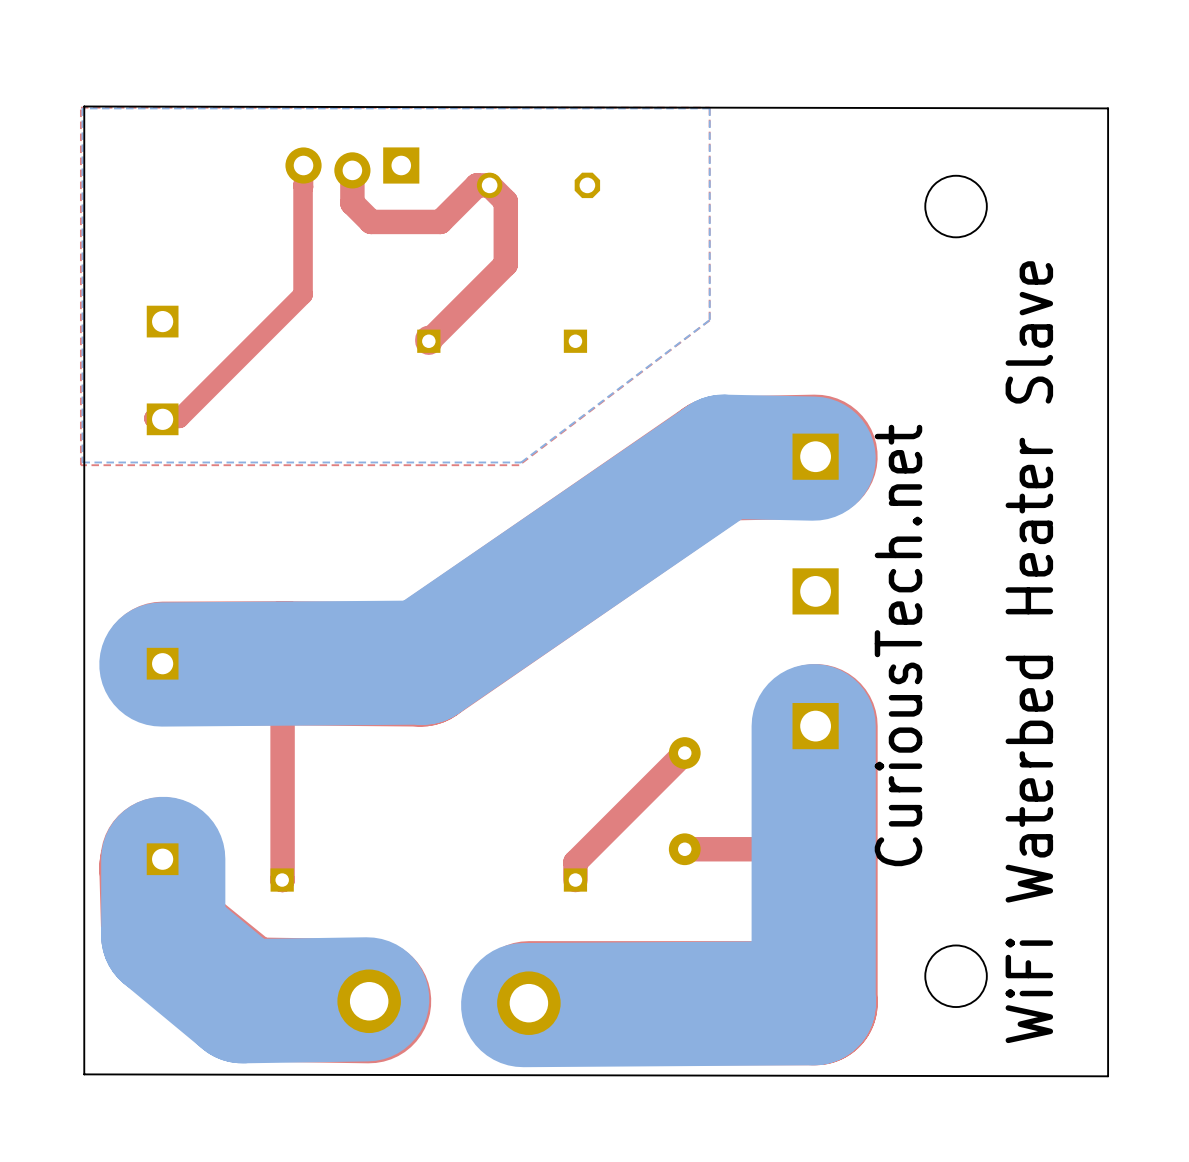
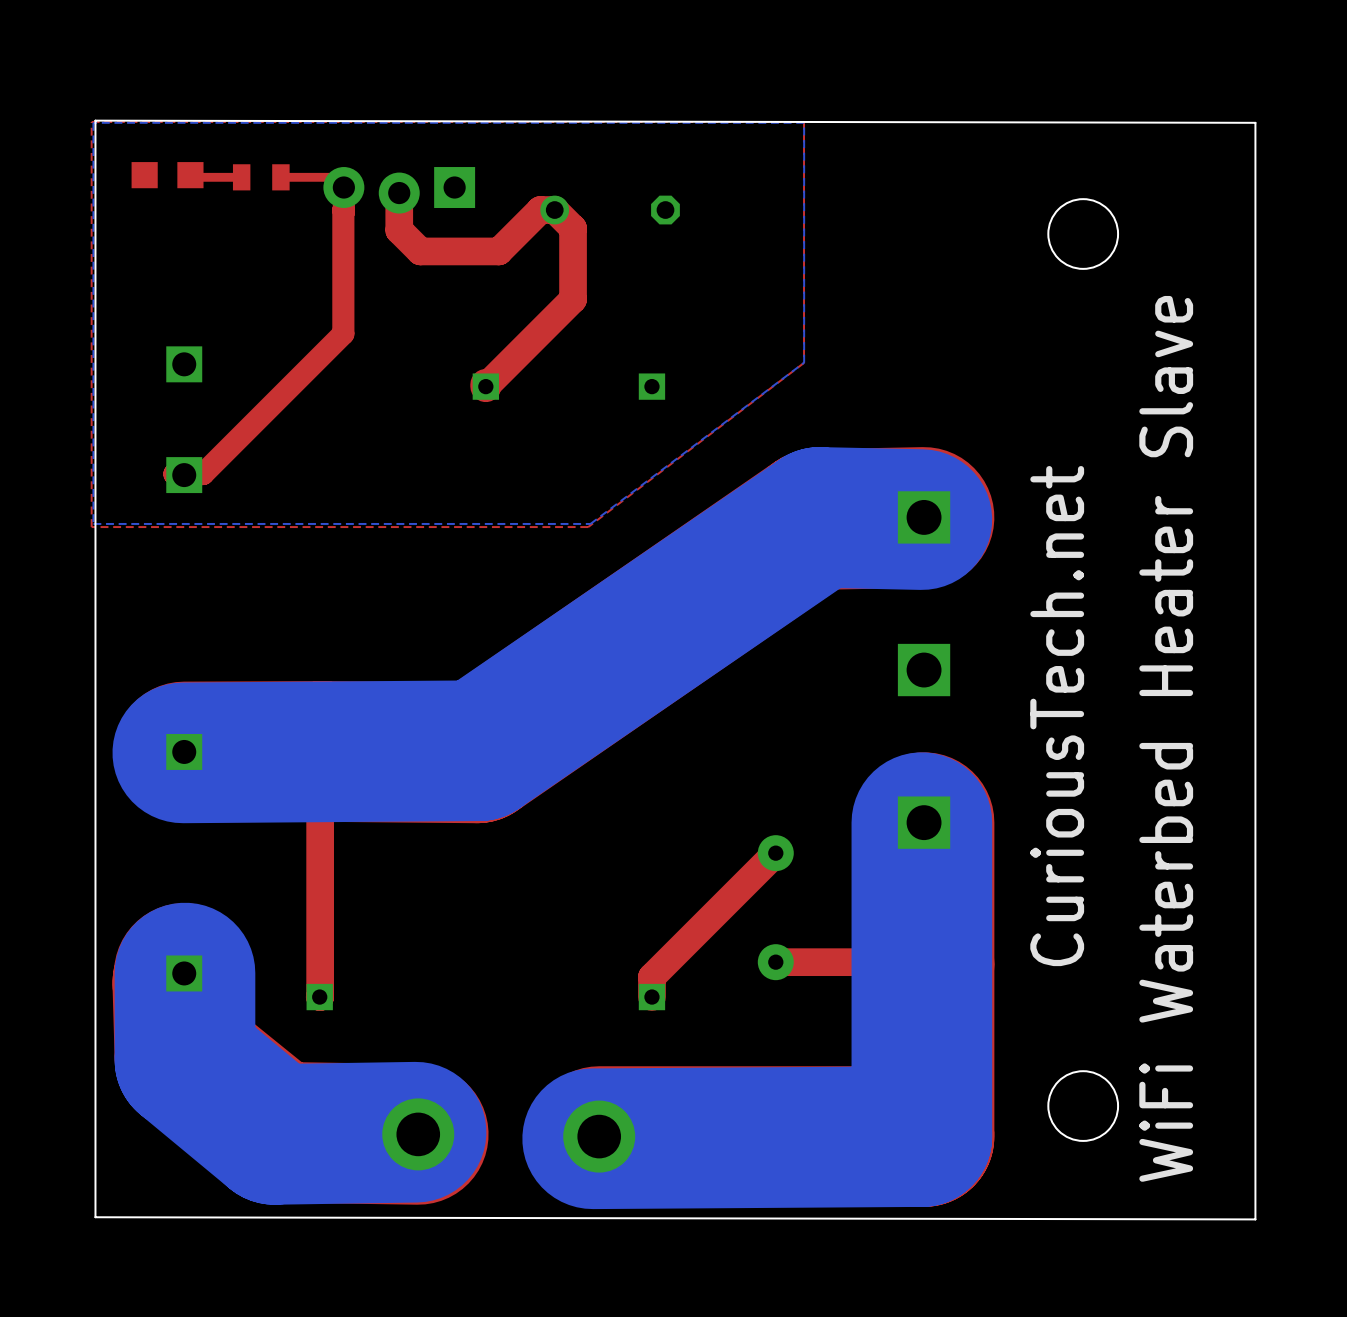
part: none -> (167, 175)
top track: none -> (190, 175) (190, 177) (241, 177)
part: none -> (261, 177)
top track: none -> (280, 177) (343, 177) (343, 187)
text position: CuriousTech.net (898, 645) -> CuriousTech.net (1057, 716)

